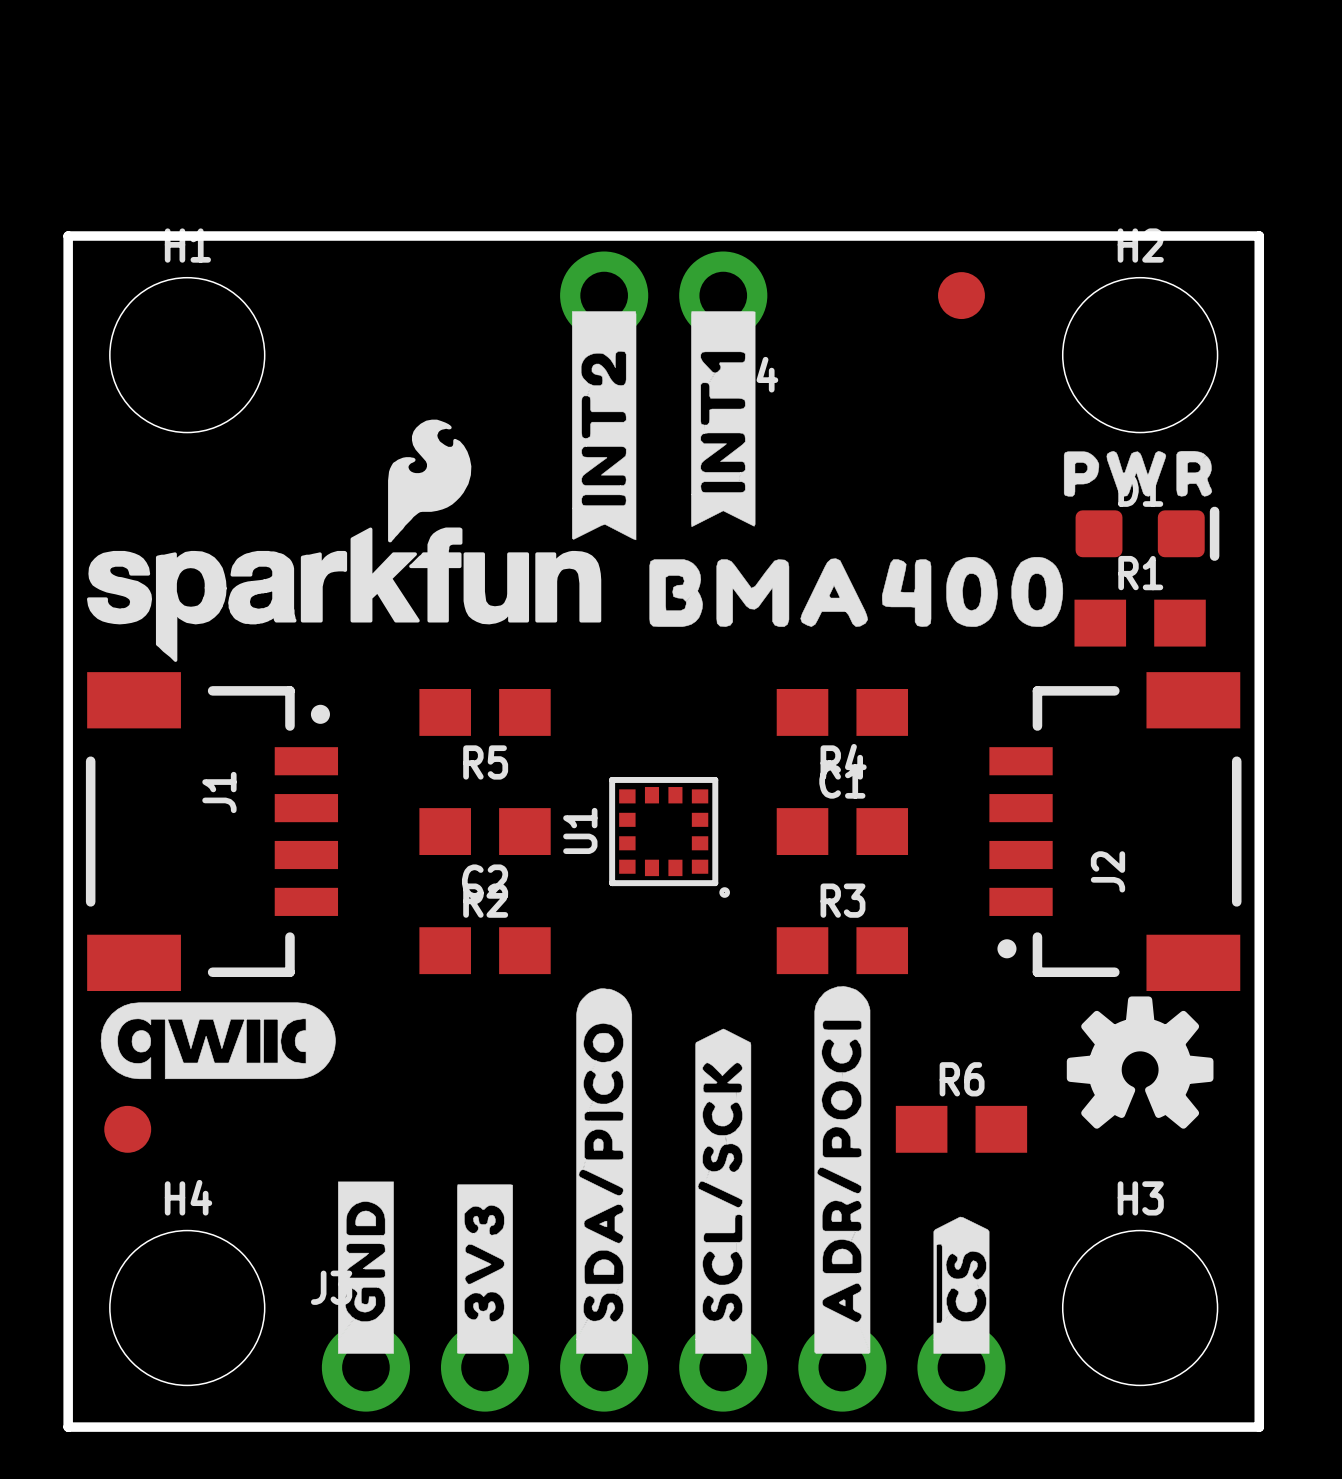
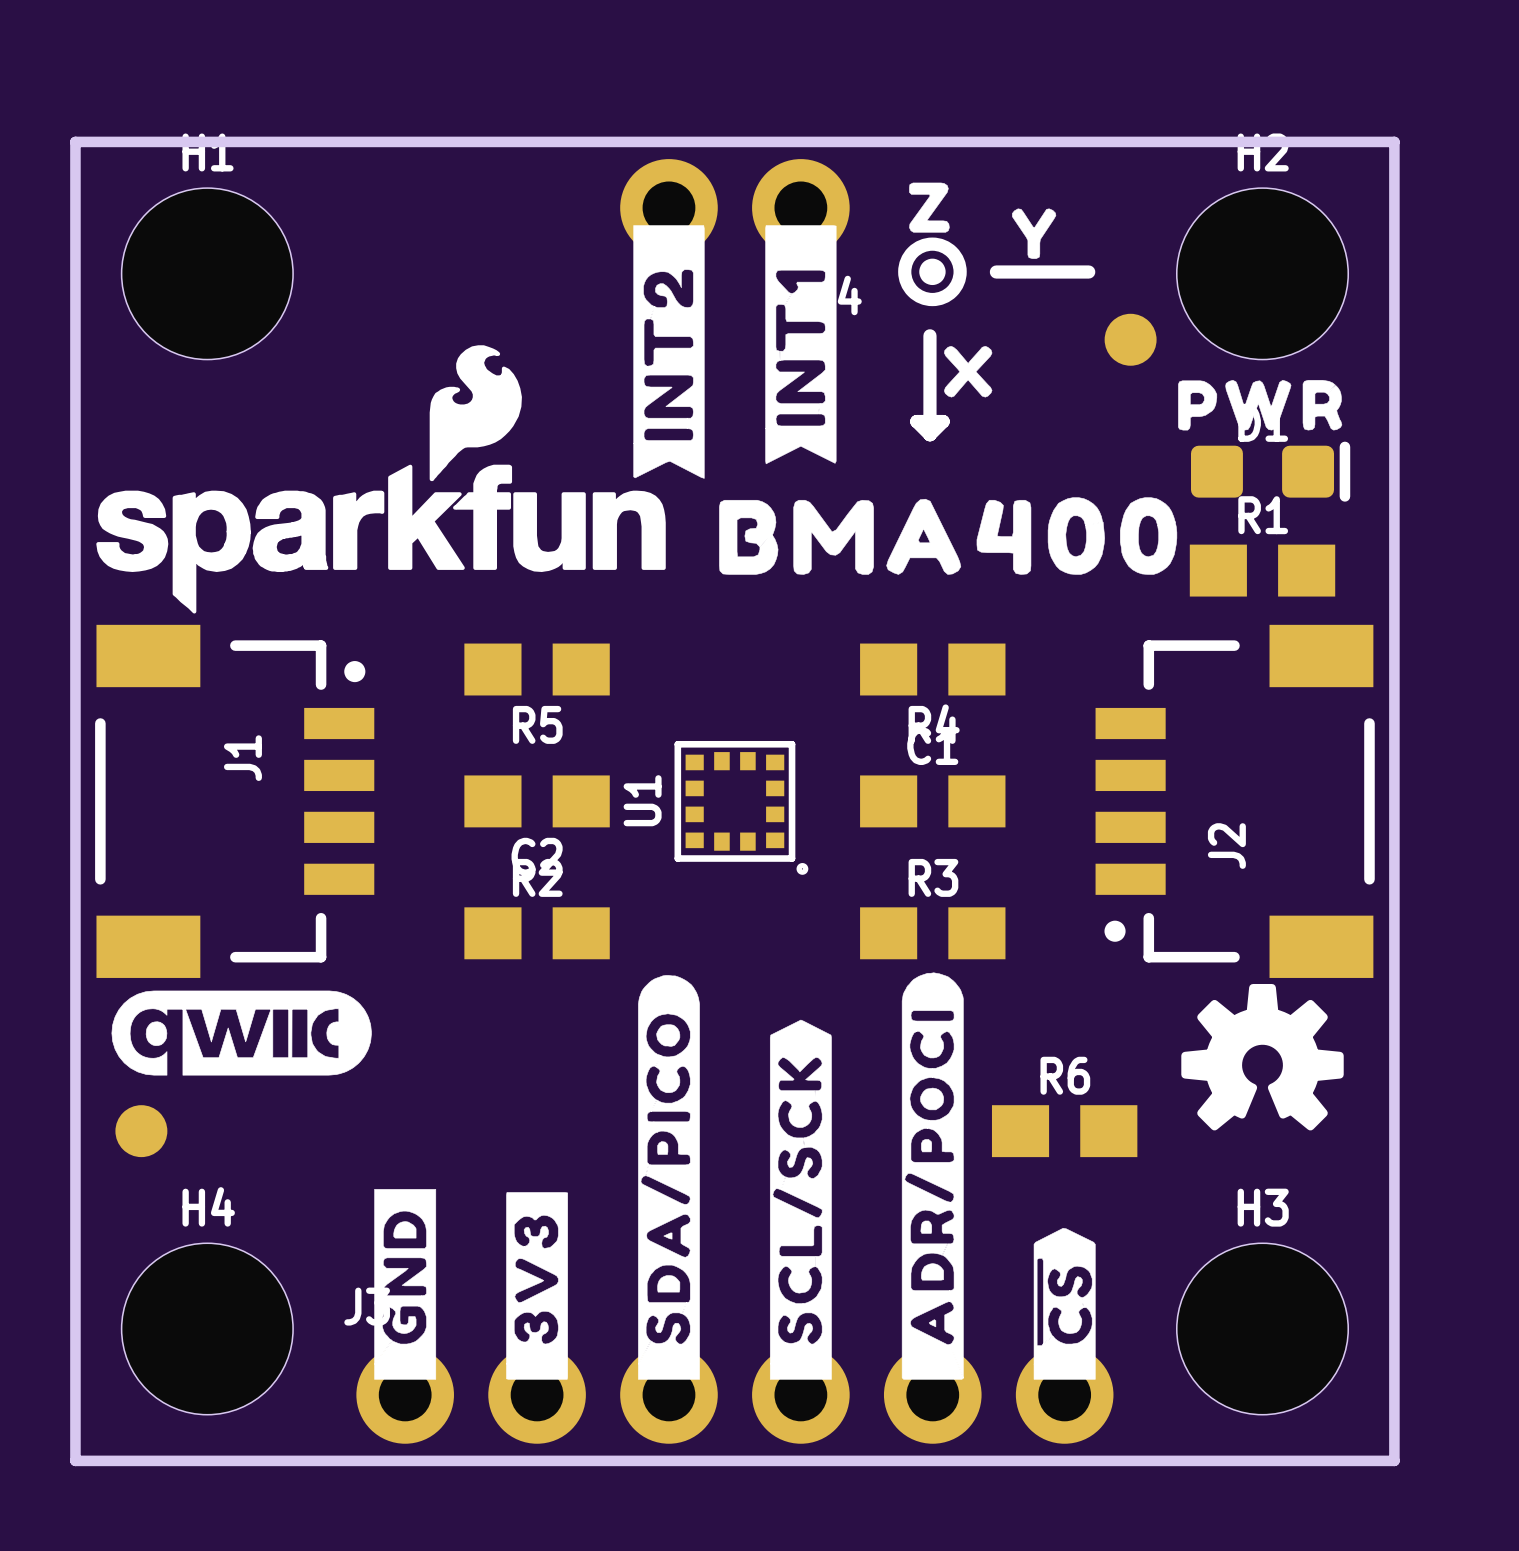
drawing: none -> [898, 182, 1057, 398]
part position: (961, 295) -> (1130, 339)
line: none -> (996, 272) (1088, 272)
line: none -> (929, 335) (929, 434)
line: none -> (929, 434) (943, 421) (916, 421) (929, 434)

